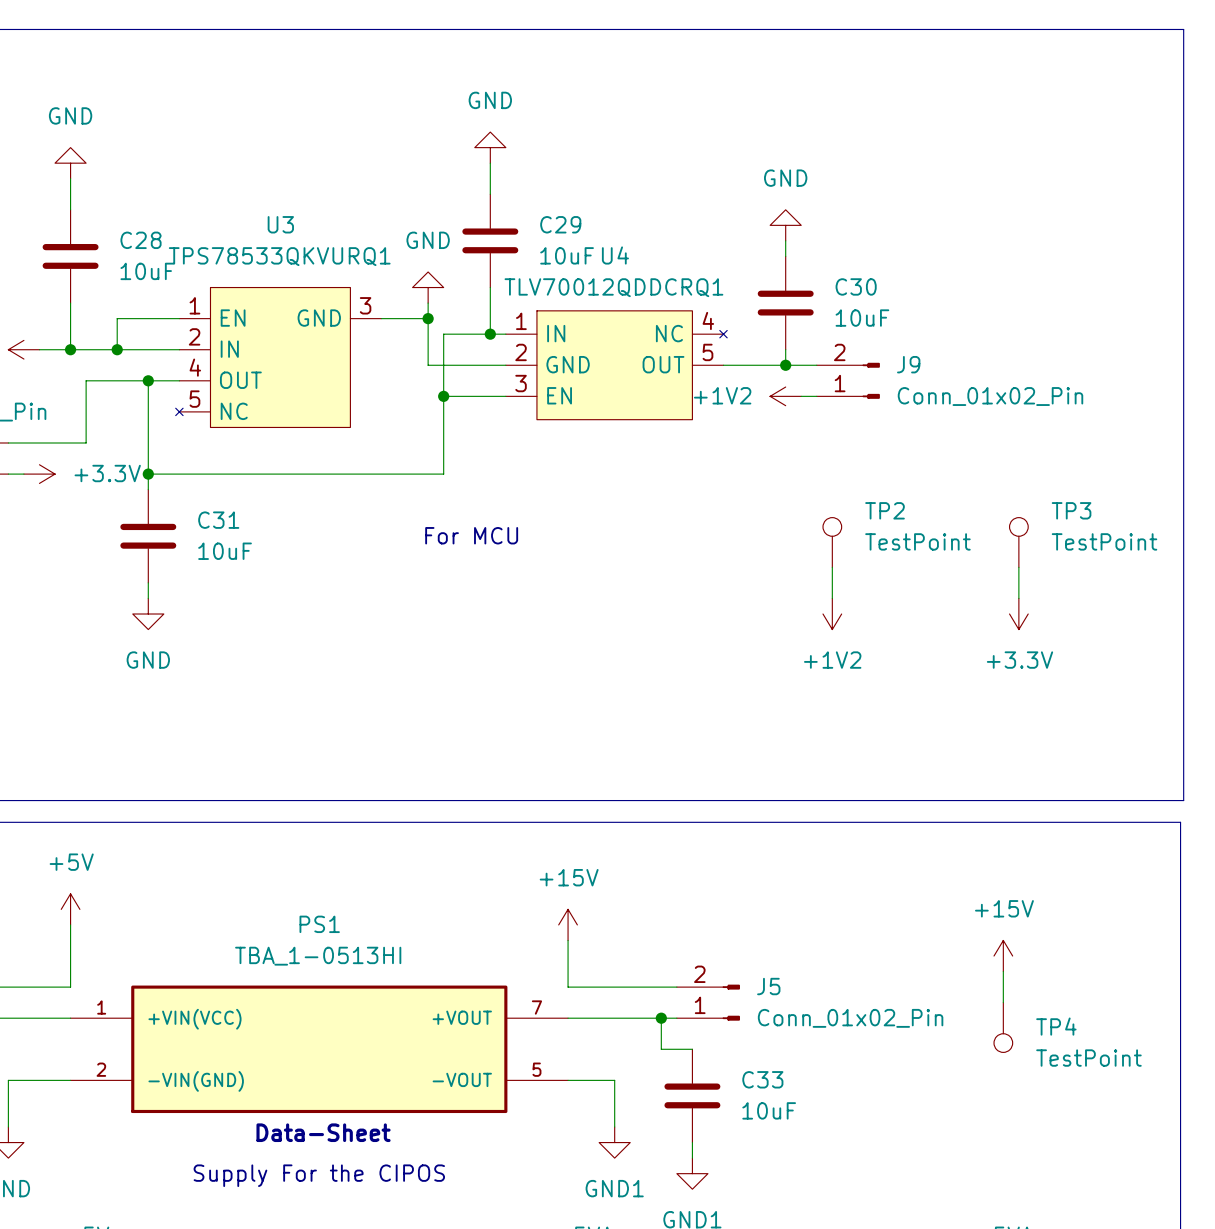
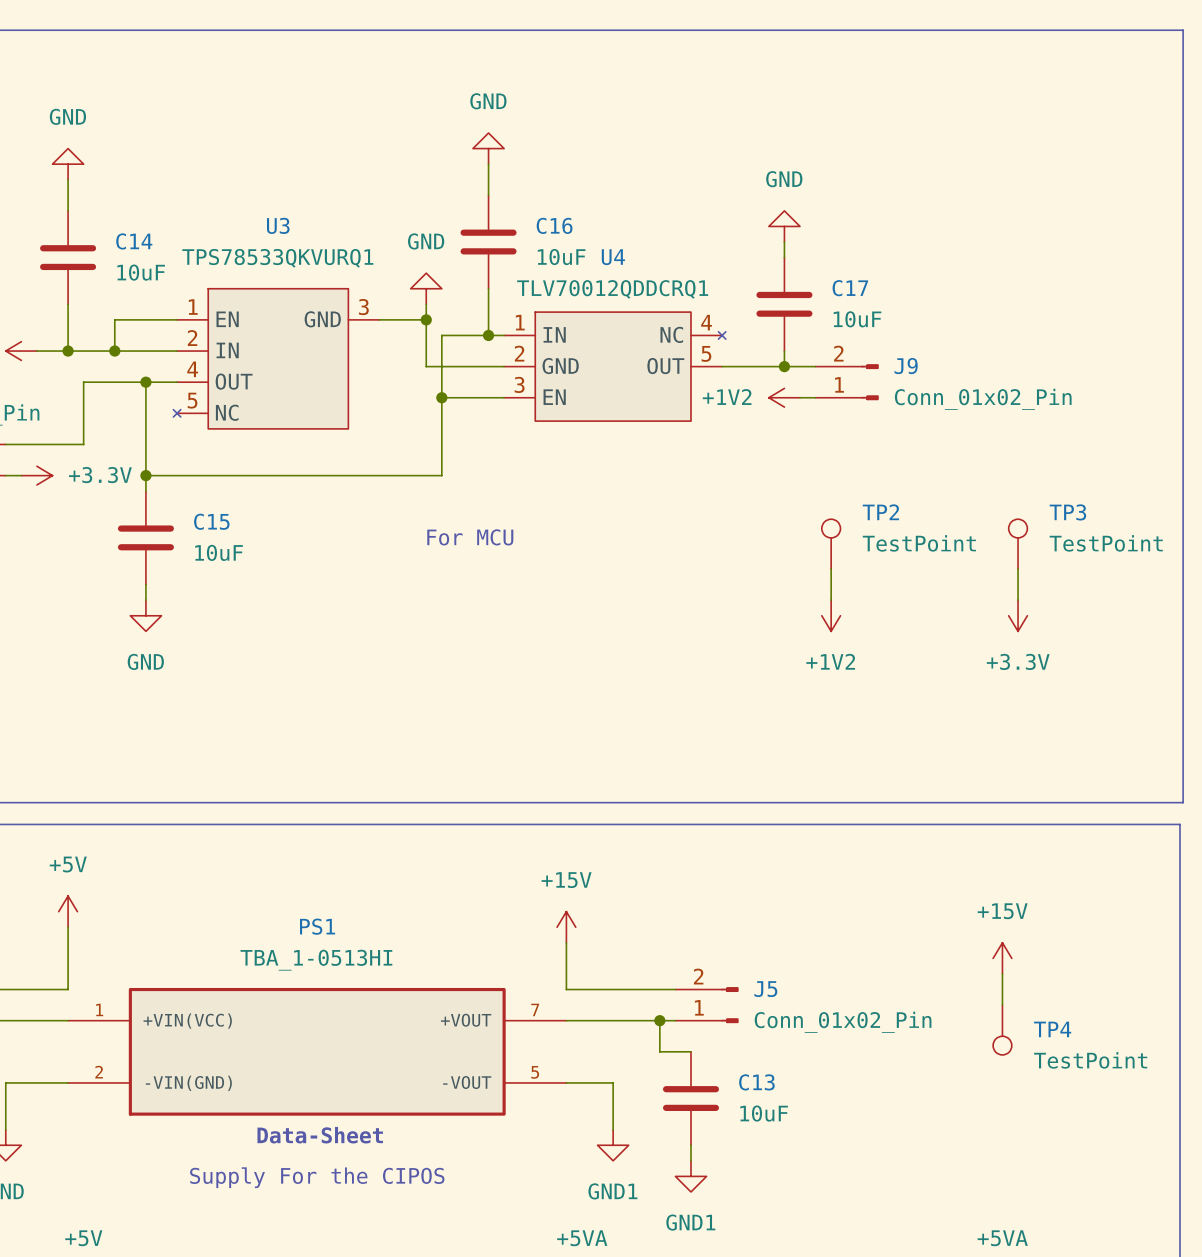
C29 name: C29 (560, 224) -> C16 (554, 225)
C28 name: C28 (141, 240) -> C14 (134, 241)
C30 name: C30 (856, 286) -> C17 (850, 288)
C31 name: C31 (218, 520) -> C15 (211, 521)
C33 name: C33 (762, 1079) -> C13 (756, 1082)

